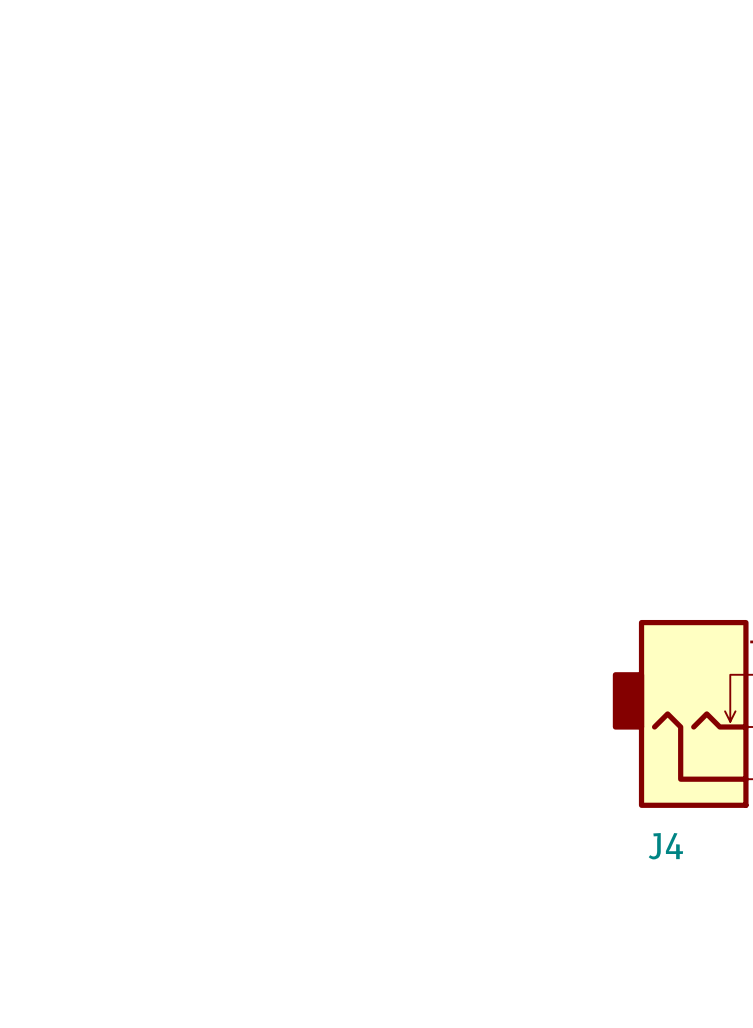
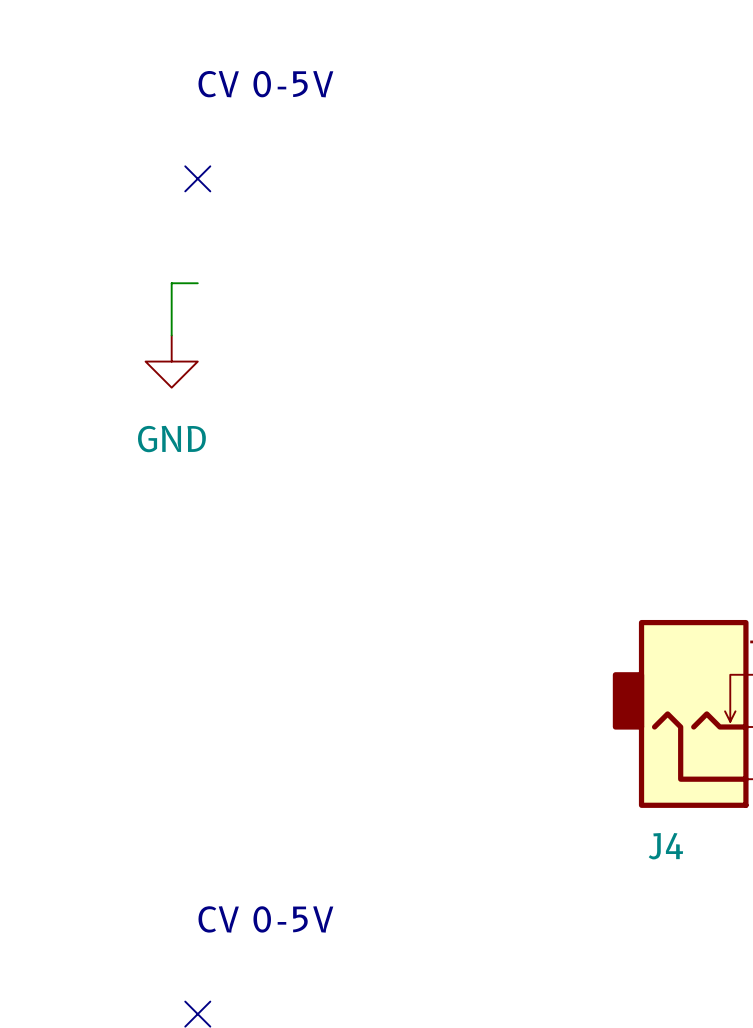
text: none -> CV 0-5V (265, 84)
no-connect mark: none -> (197, 178)
wire: none -> (197, 283) (171, 283) (171, 335)
power symbol: none -> GND (171, 361)
text: none -> CV 0-5V (265, 919)
no-connect mark: none -> (197, 1014)

